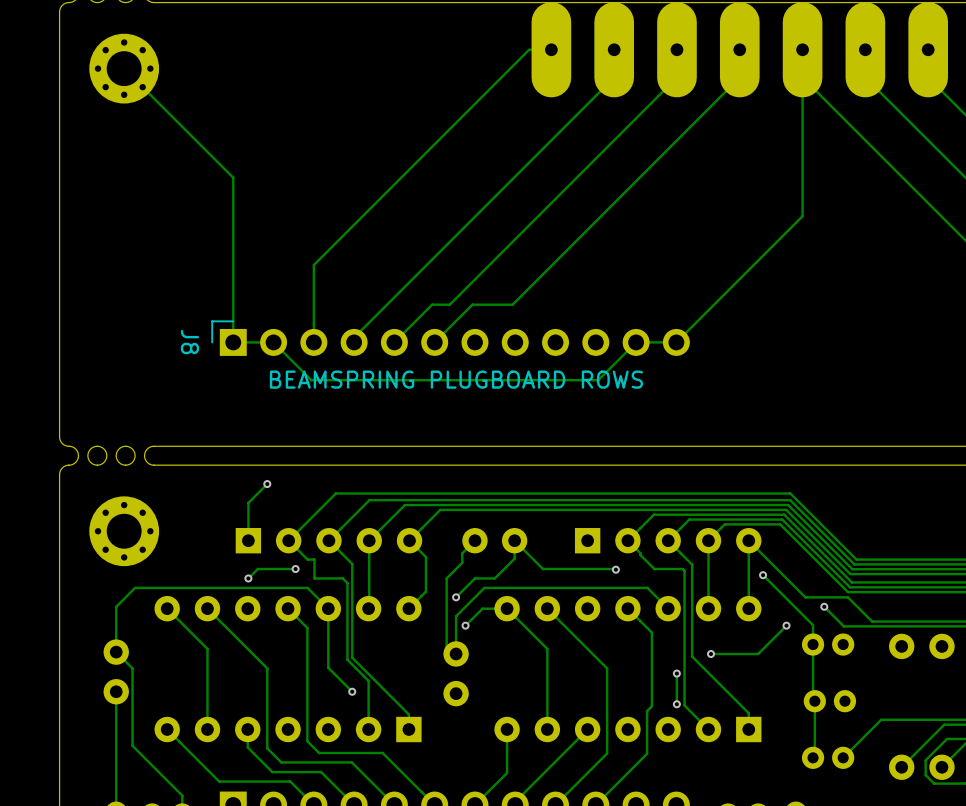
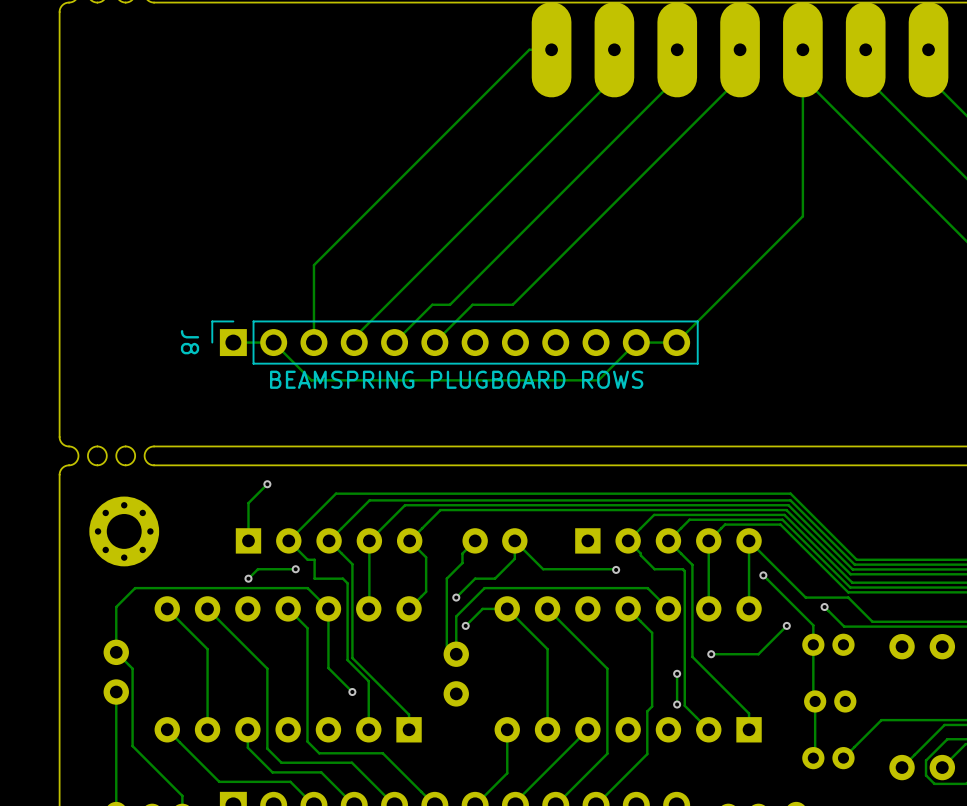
track: (124, 68) (233, 177) (233, 342) -> none
part: (124, 68) -> none
J8 footprint: [211, 320, 690, 356] -> [211, 320, 699, 365]

